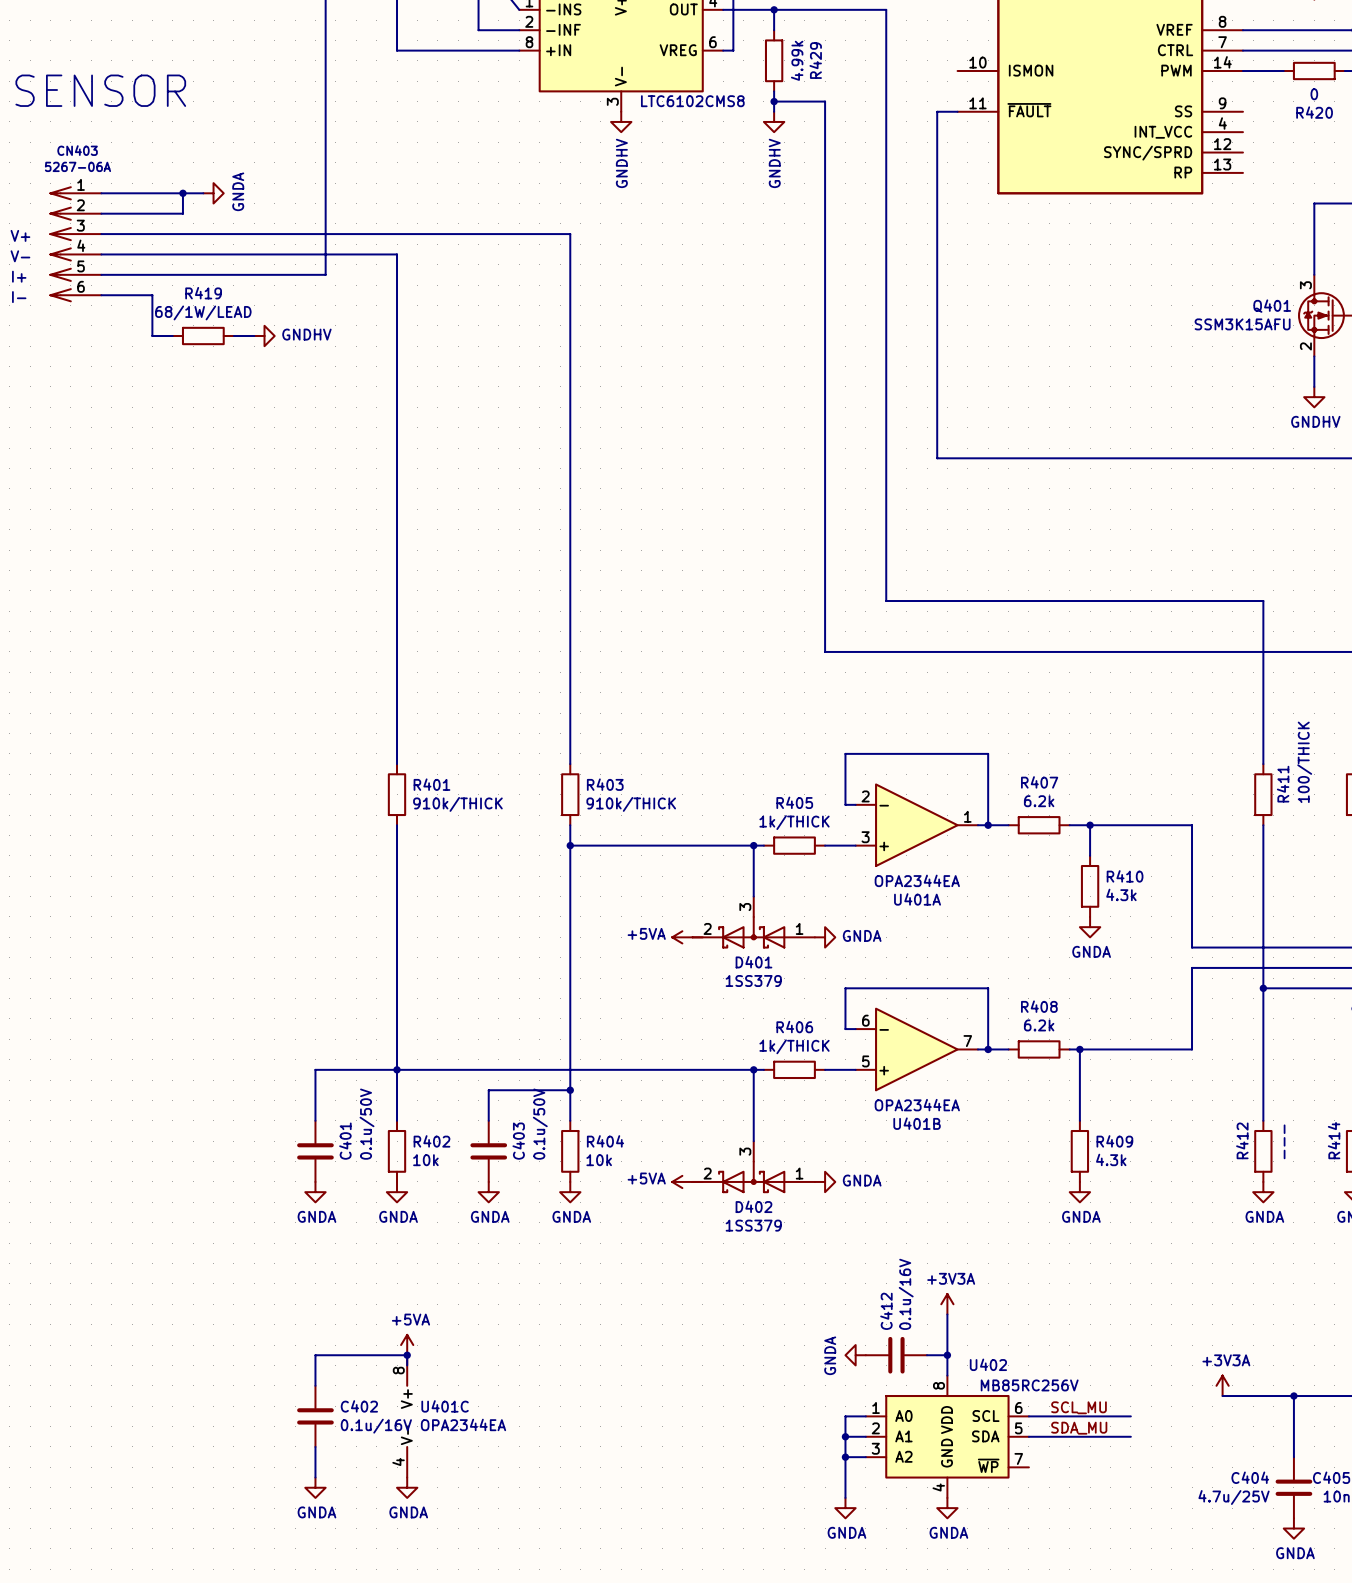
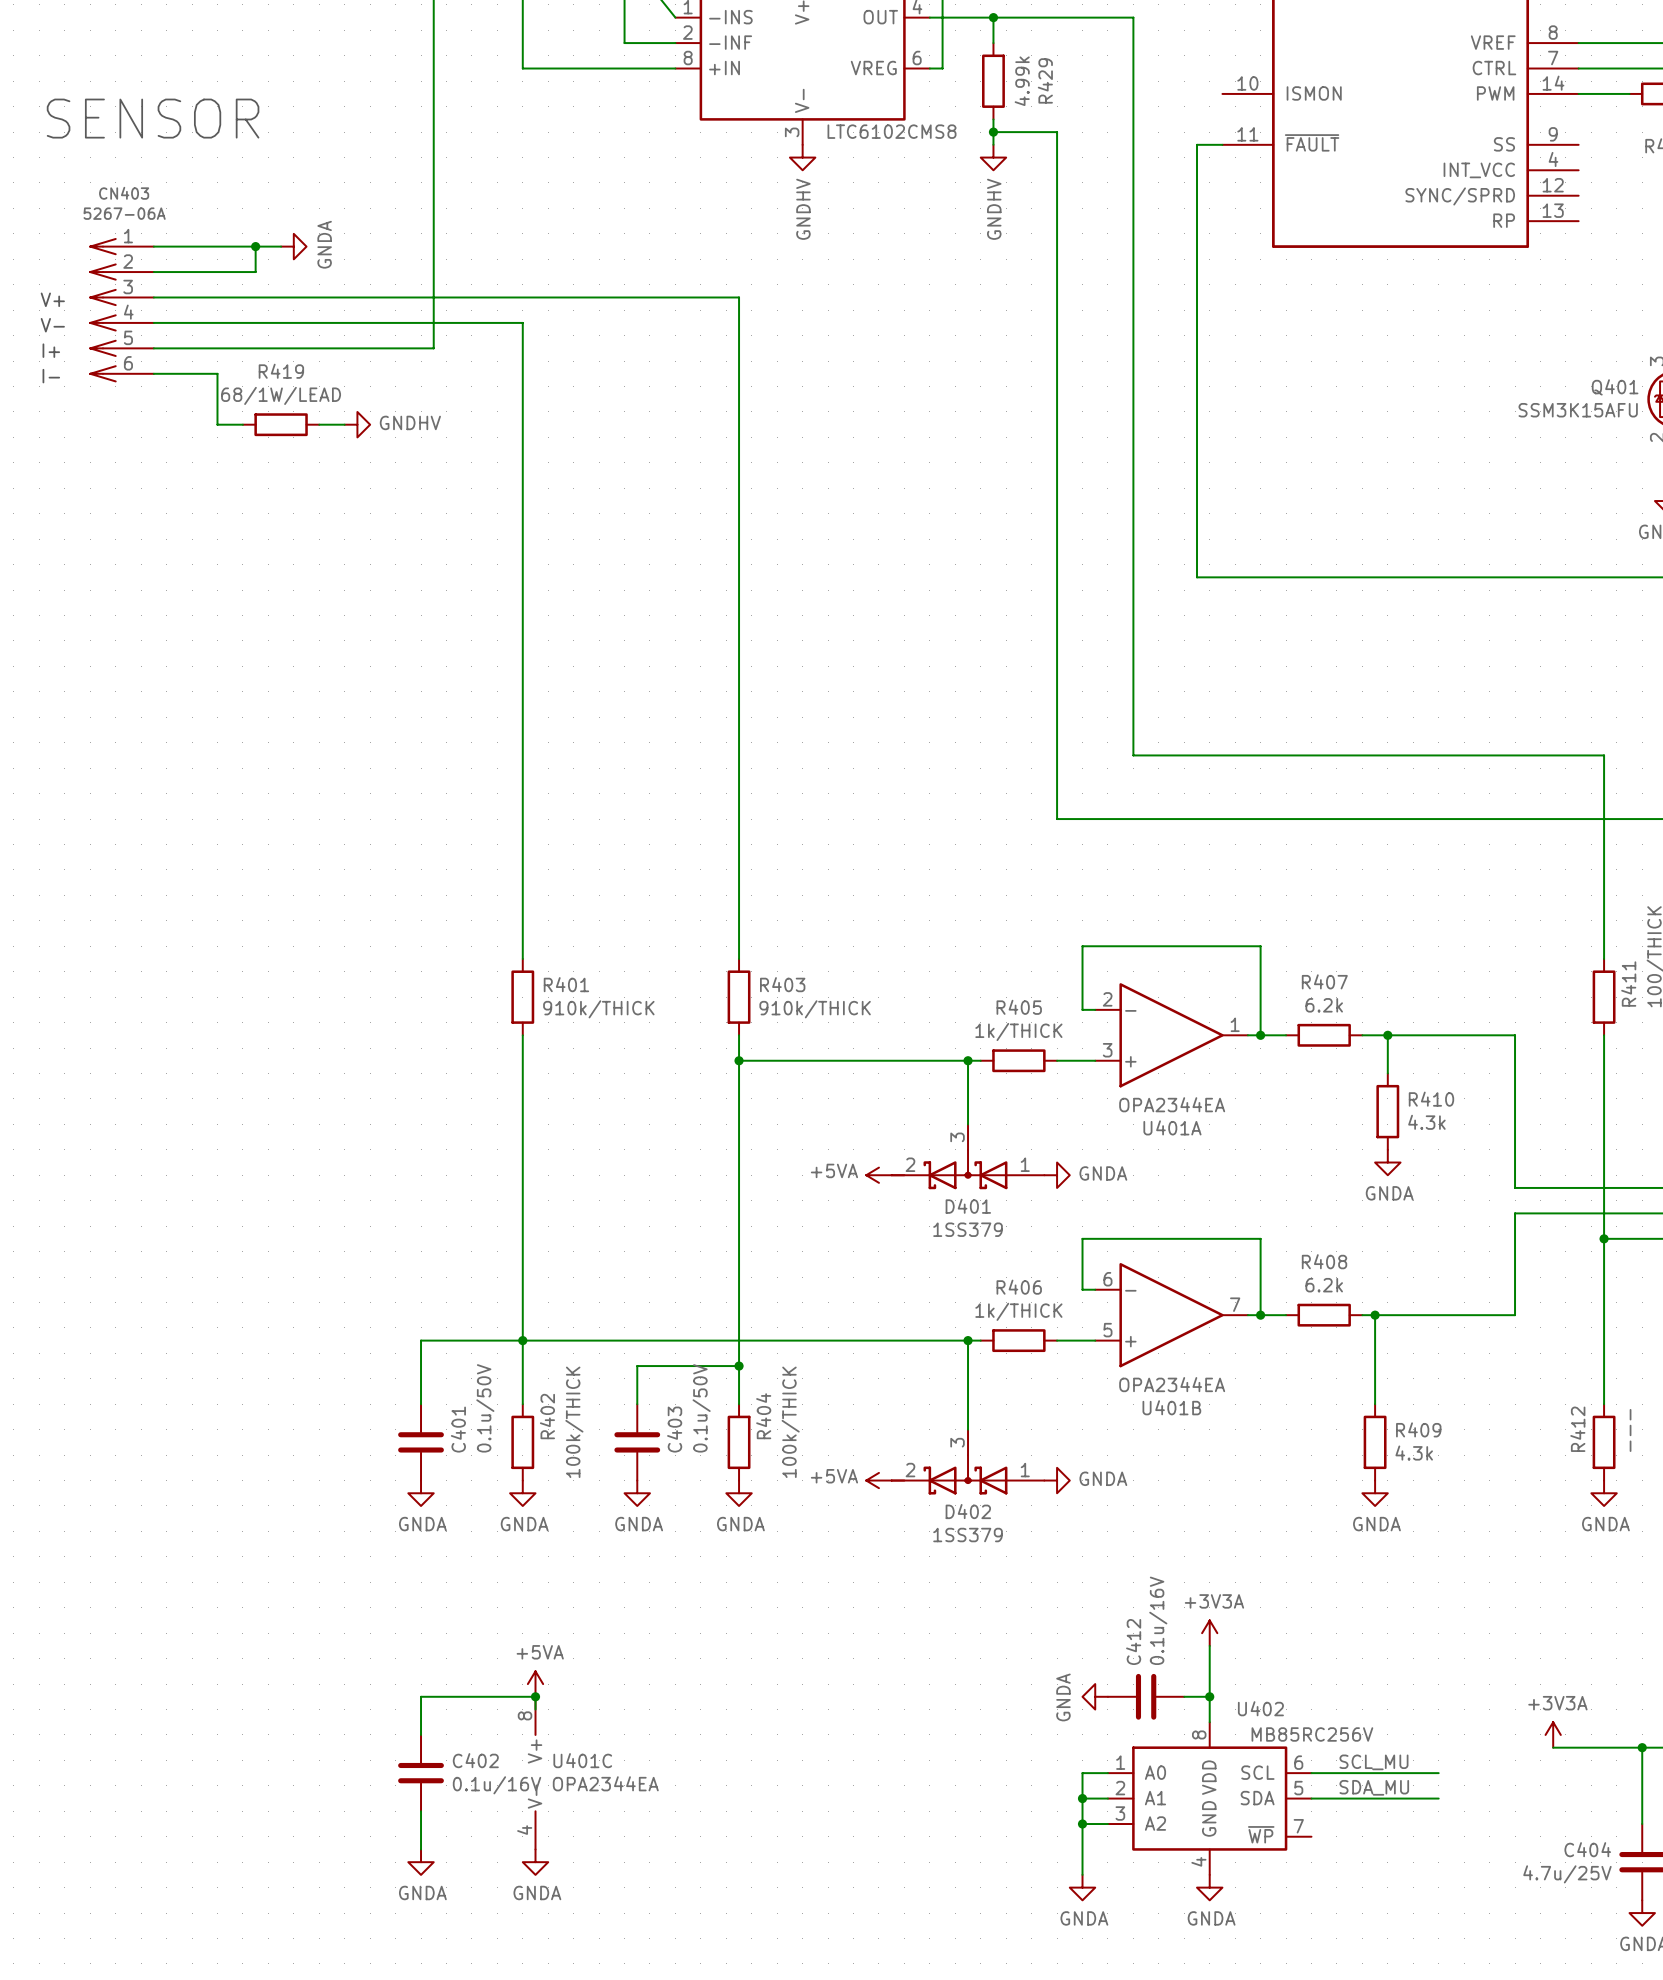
R402 name rotation: 0° (431, 1141) -> 90° counterclockwise (547, 1416)
R404 name rotation: 0° (605, 1141) -> 90° counterclockwise (763, 1416)
R402 value: 10k (425, 1160) -> 100k/THICK (574, 1422)
R404 value: 10k (599, 1160) -> 100k/THICK (790, 1422)

